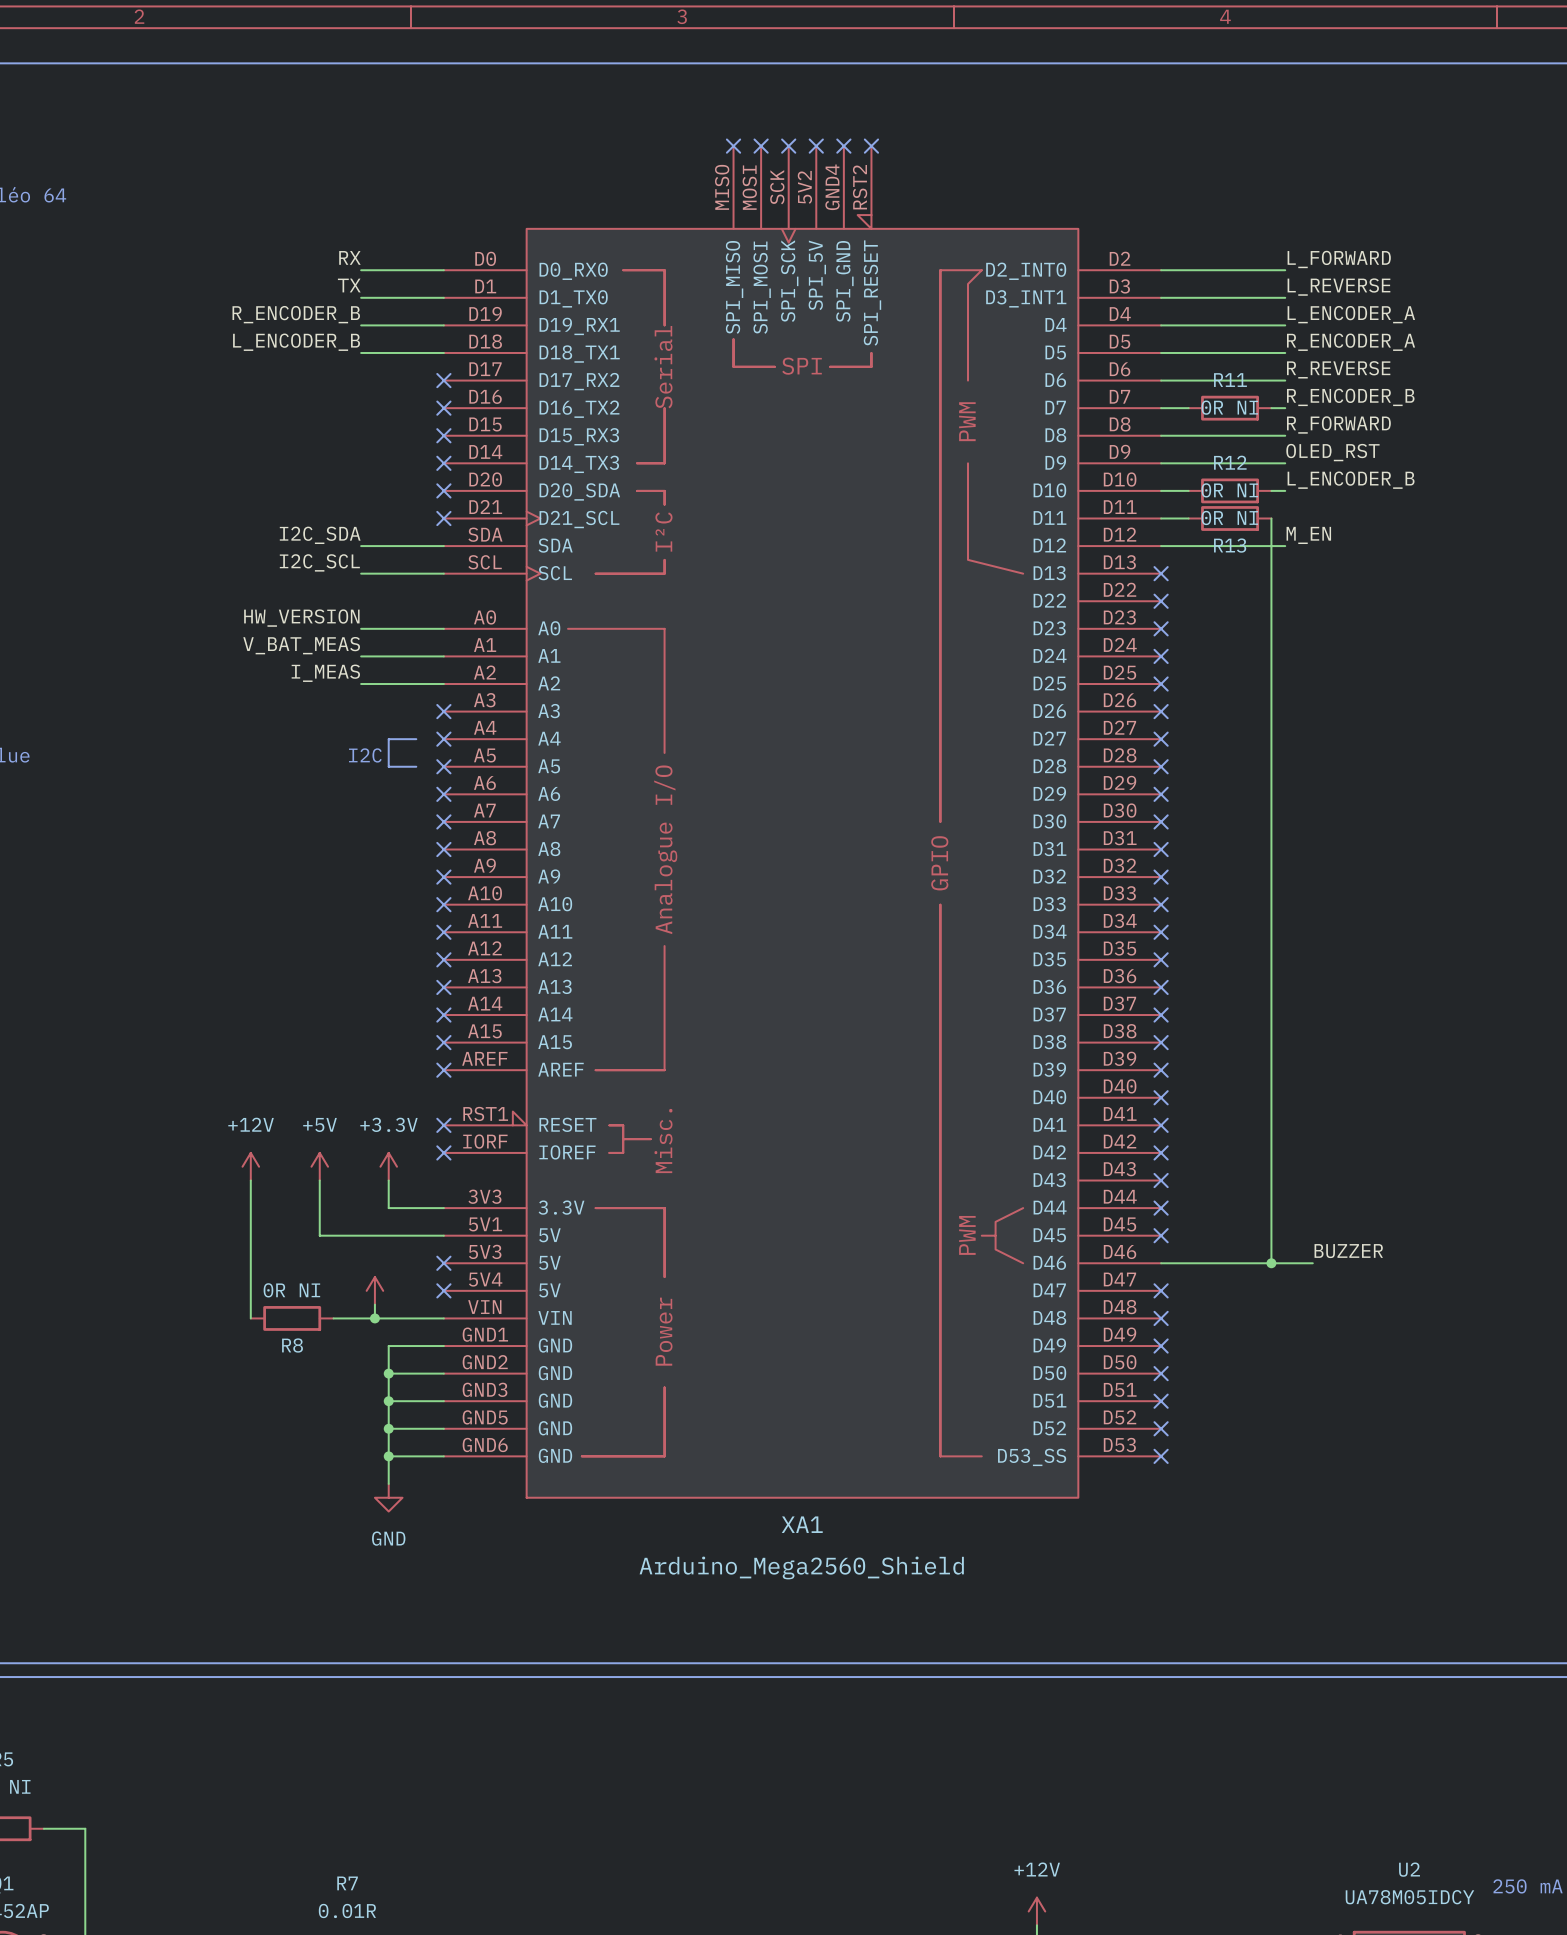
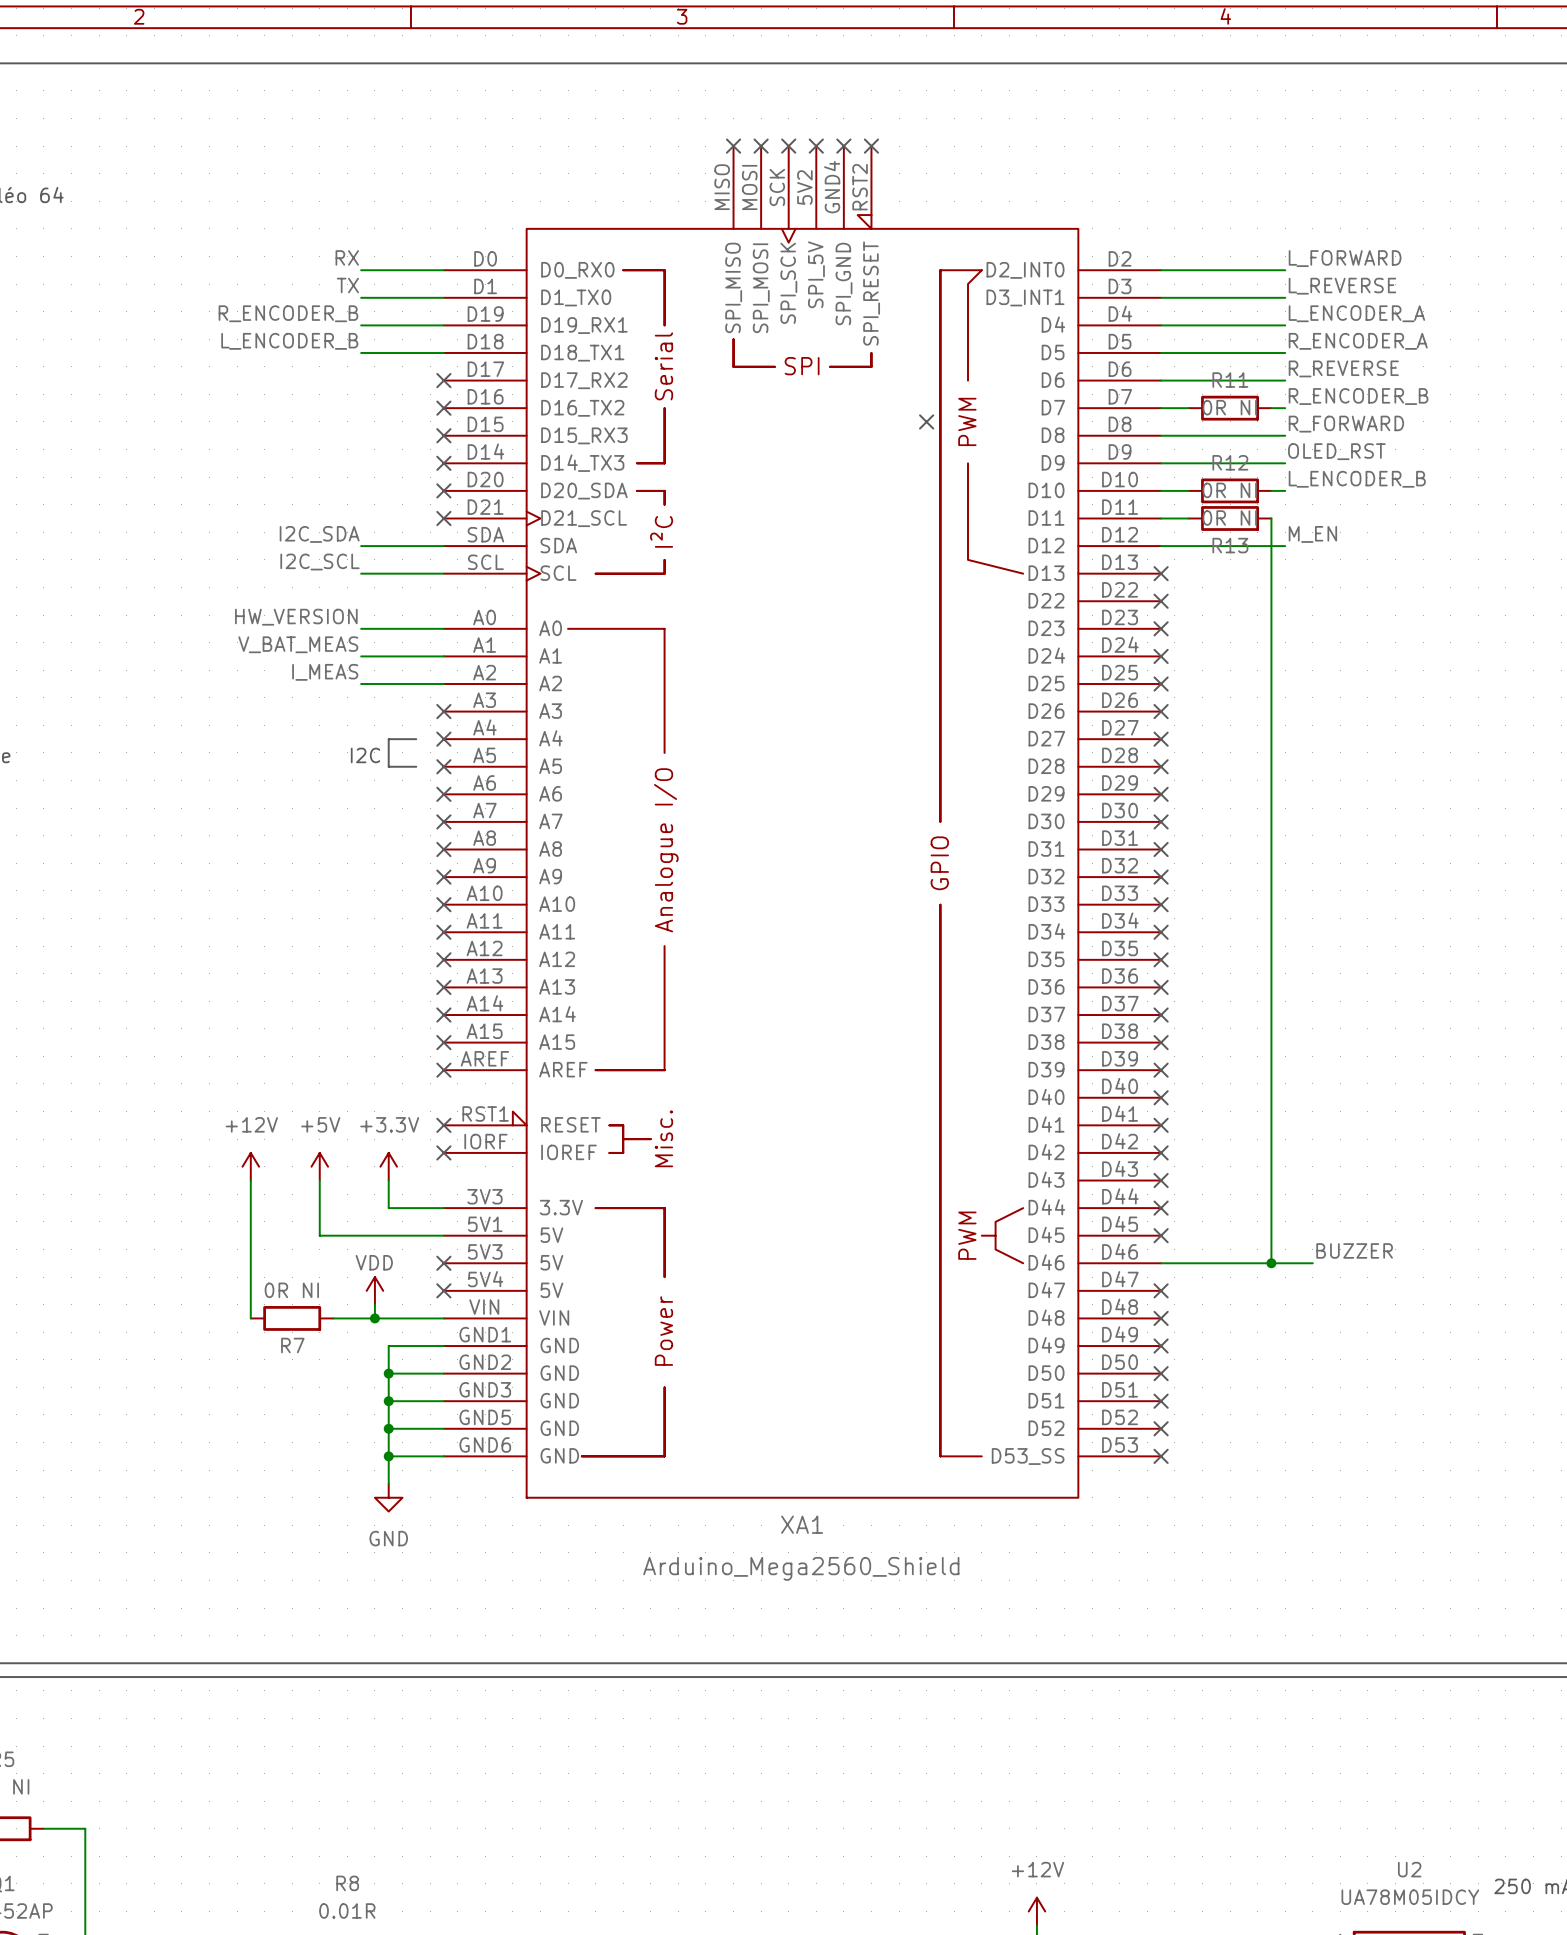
no-connect mark: none -> (926, 421)
power symbol text: none -> VDD (374, 1262)
R8 name: R8 (292, 1345) -> R7 (292, 1345)
R7 name: R7 (347, 1883) -> R8 (347, 1883)

